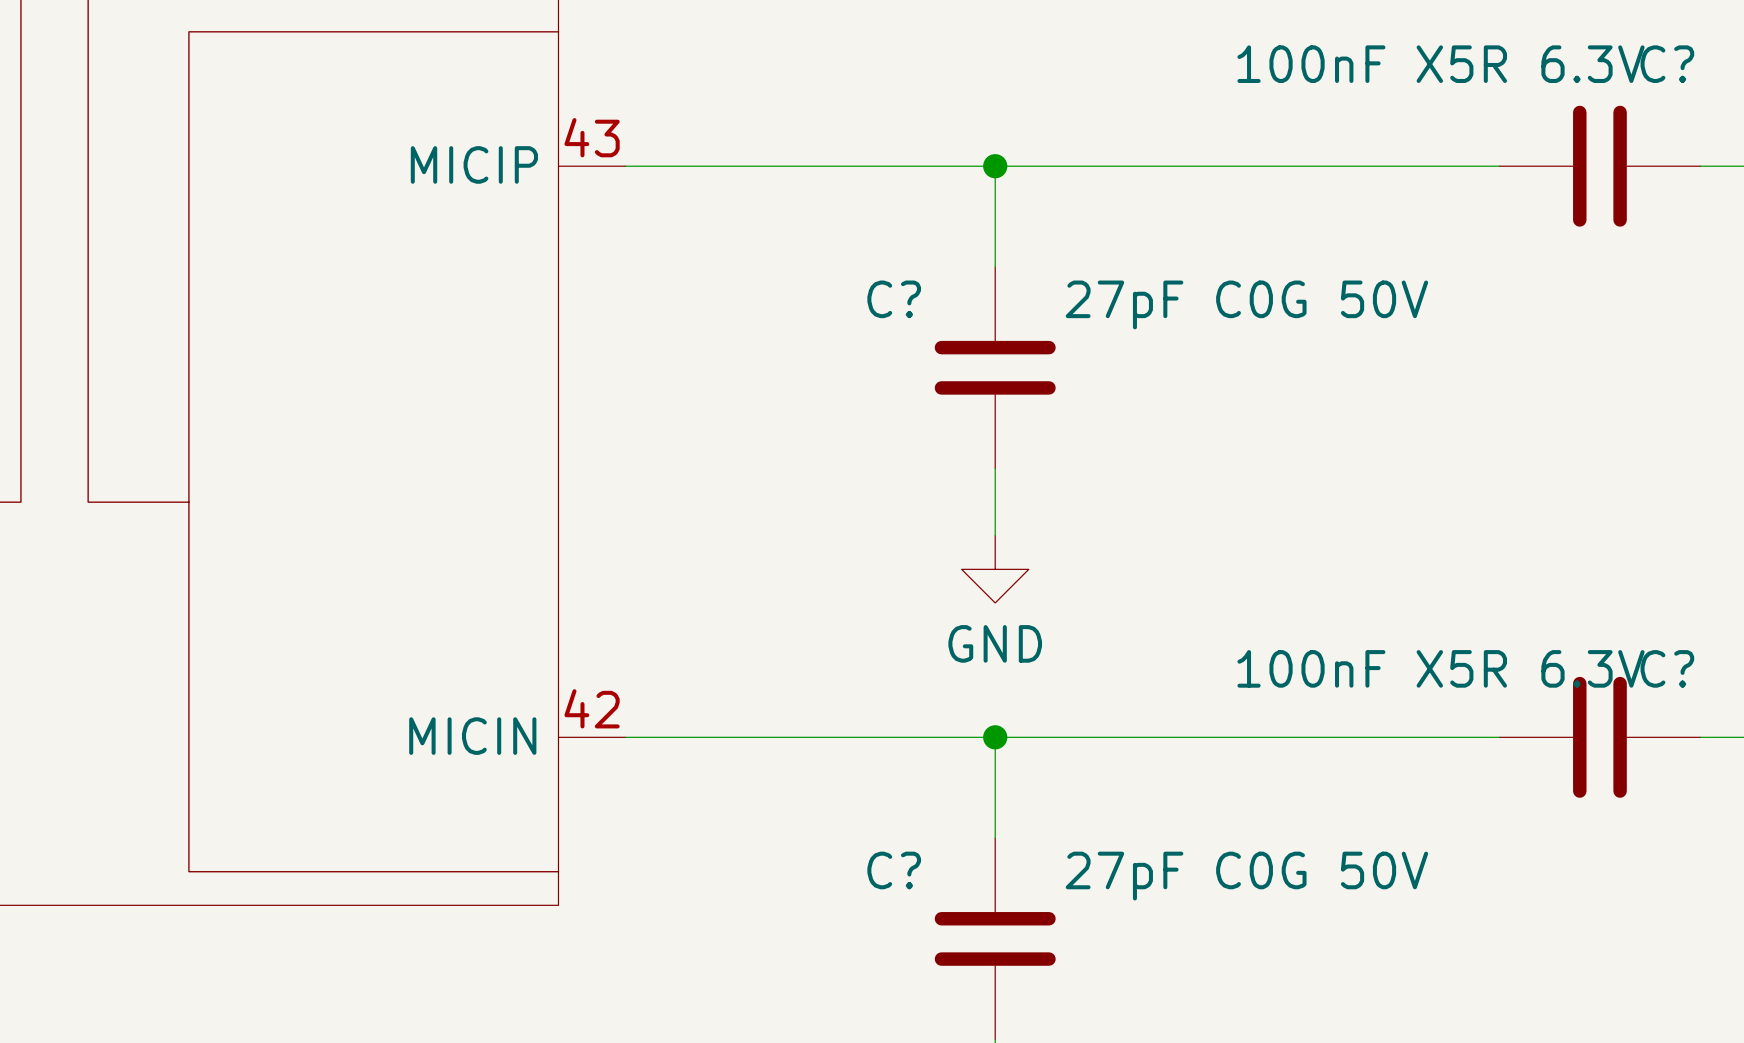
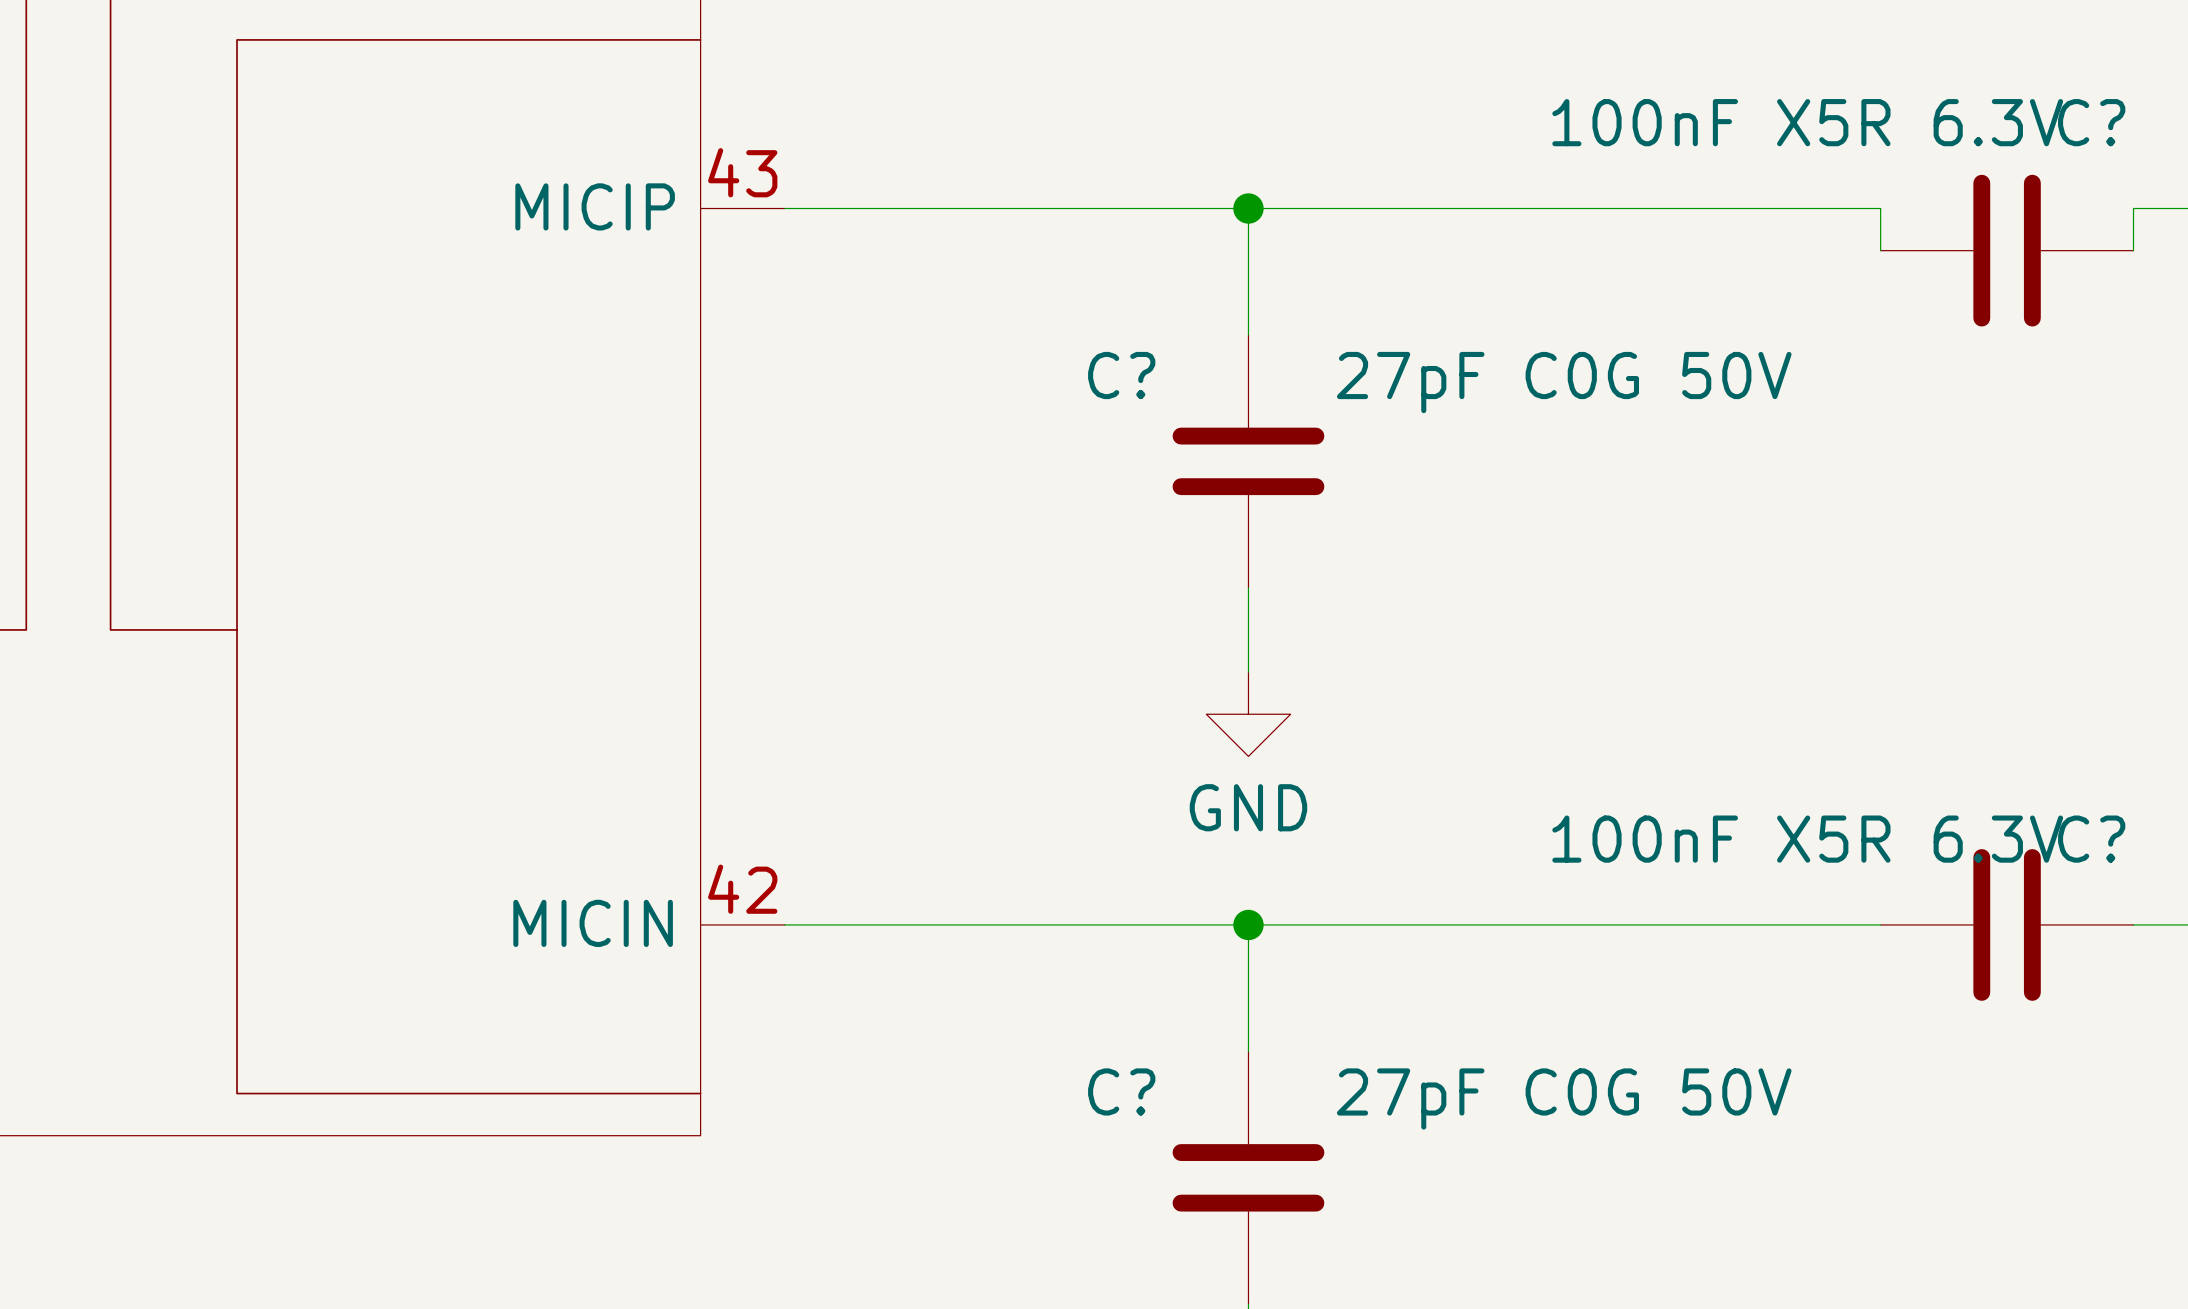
wire: none -> (1880, 208) (1880, 250)
C? position: (1599, 166) -> (2007, 250)
wire: none -> (2133, 208) (2133, 250)

